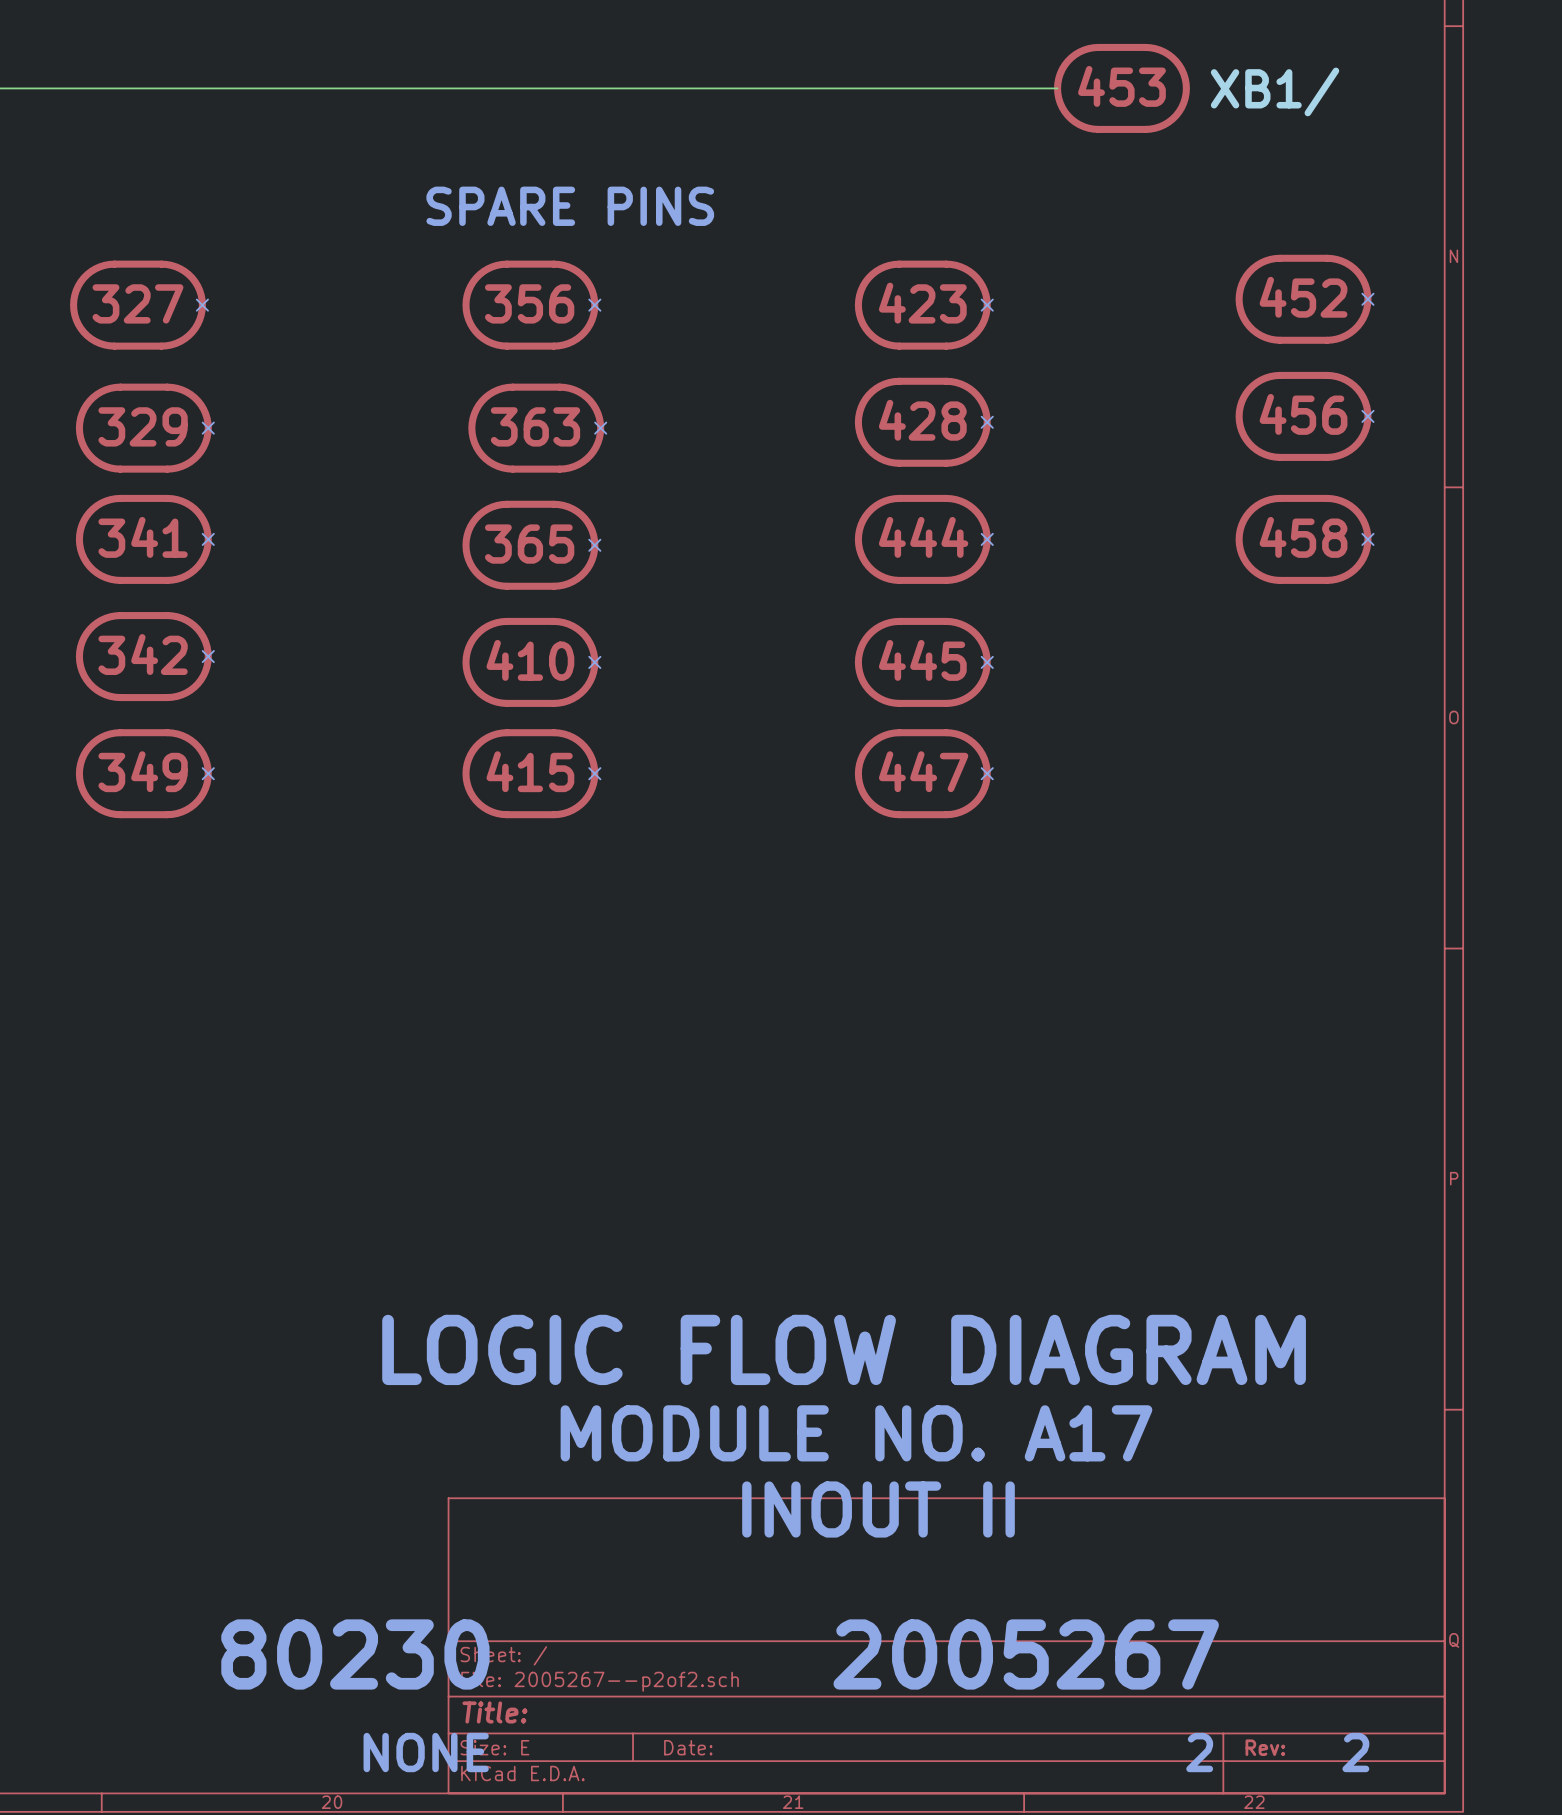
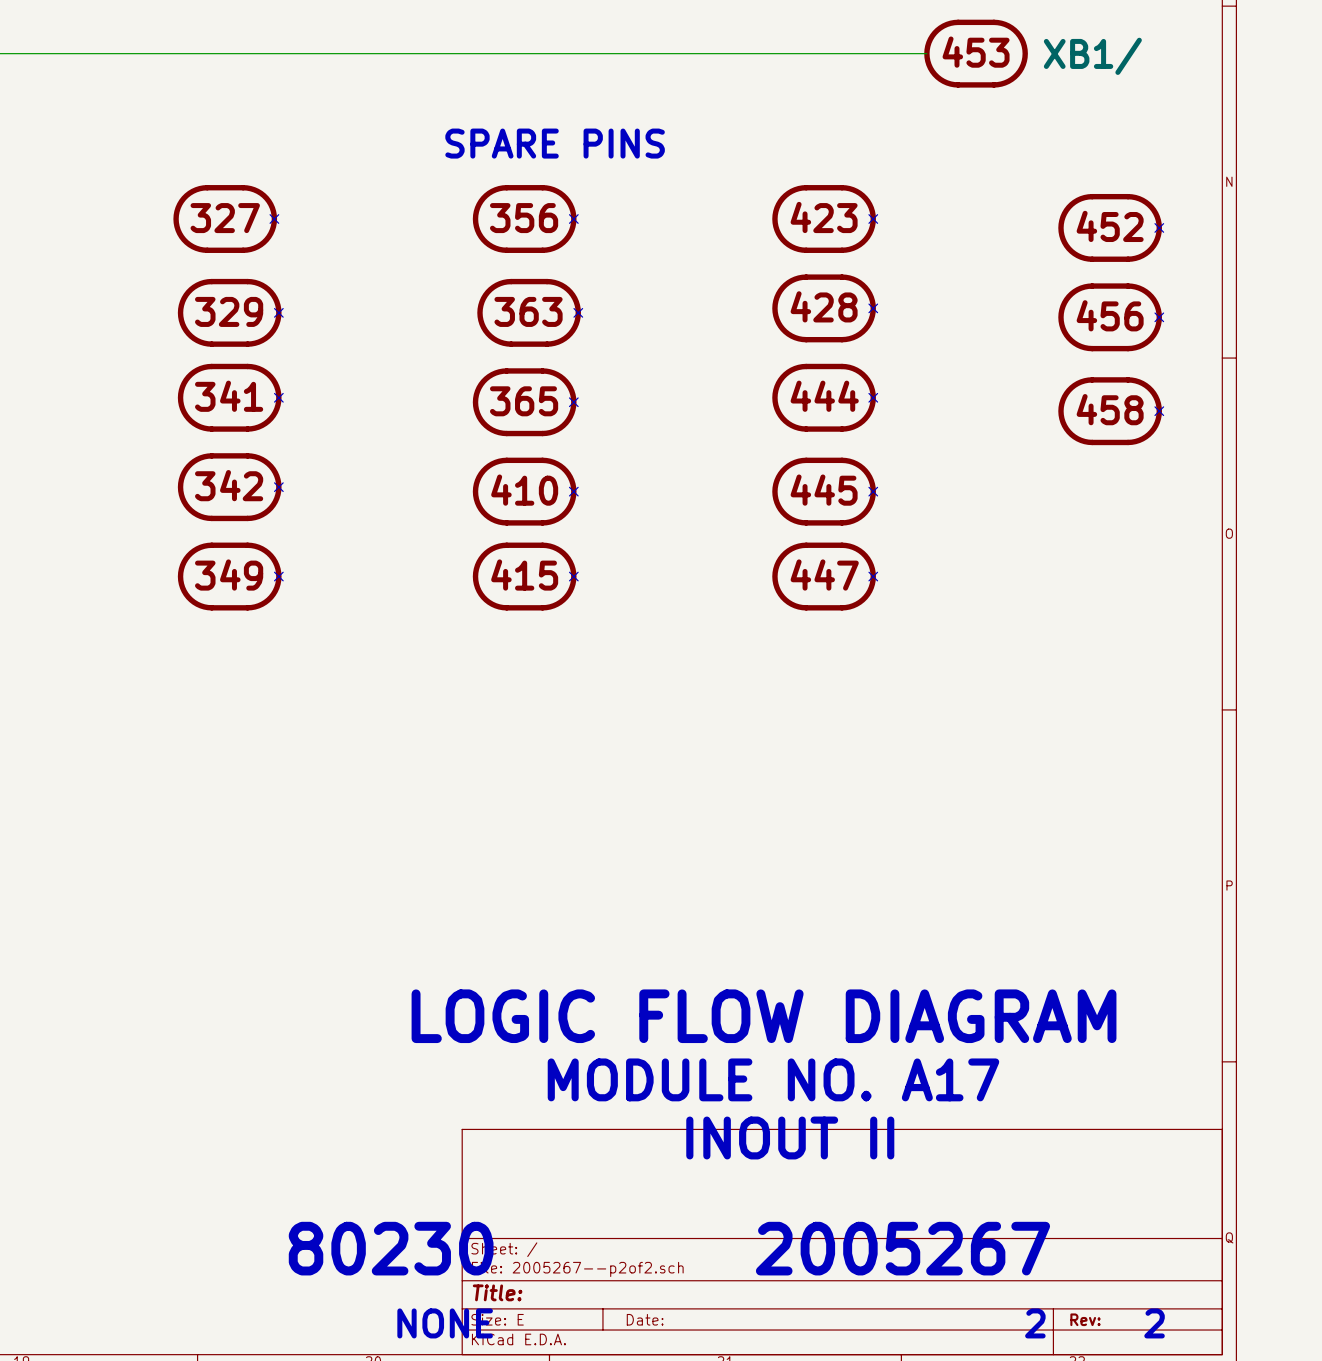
part position: (1303, 299) -> (1110, 227)
no-connect mark position: (1367, 299) -> (1159, 227)
part position: (1303, 416) -> (1110, 317)
no-connect mark position: (1367, 416) -> (1159, 317)
part position: (1303, 539) -> (1110, 411)
no-connect mark position: (1367, 539) -> (1159, 411)

